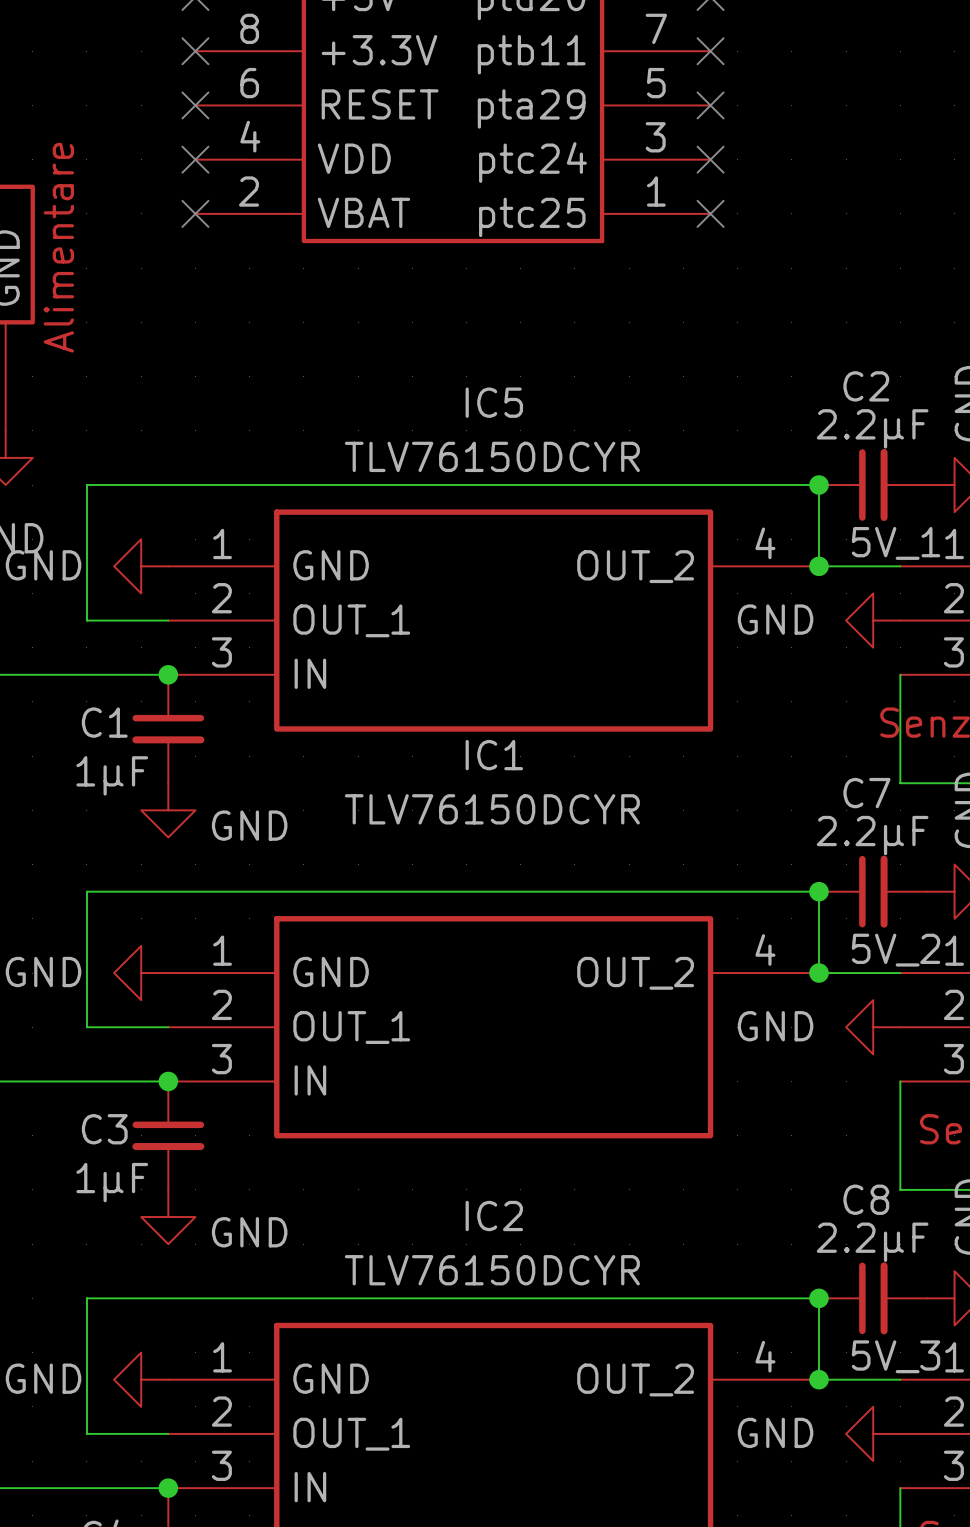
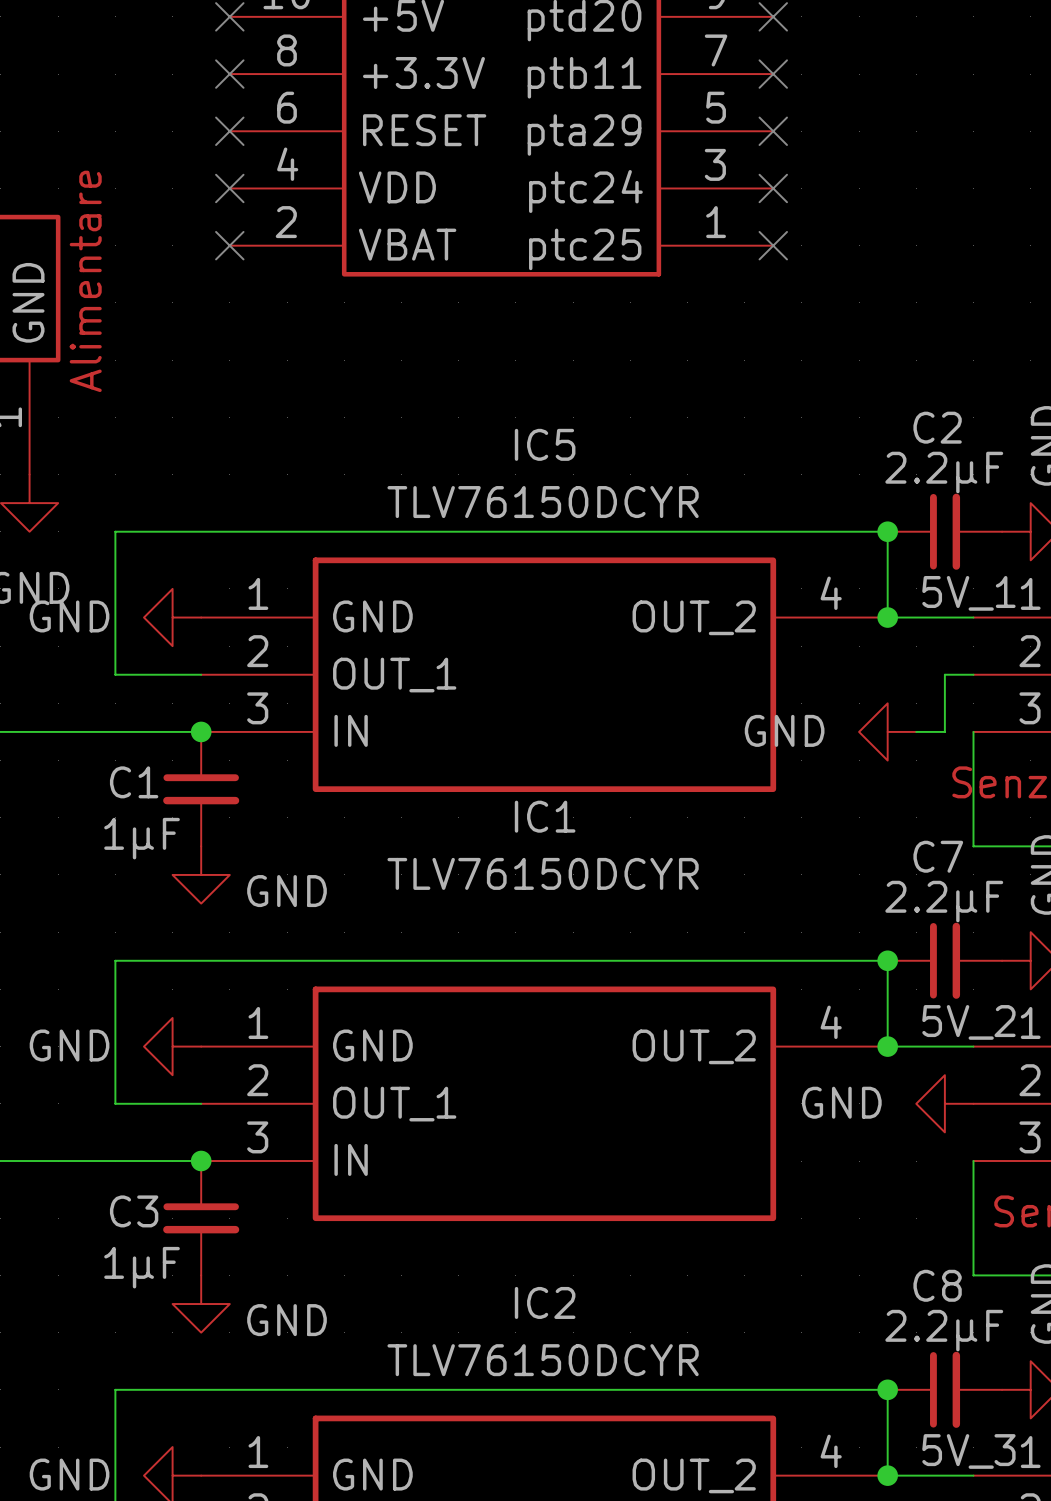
power symbol position: GND (873, 620) -> GND (887, 731)
wire: none -> (973, 674) (944, 674) (944, 731) (916, 731)

